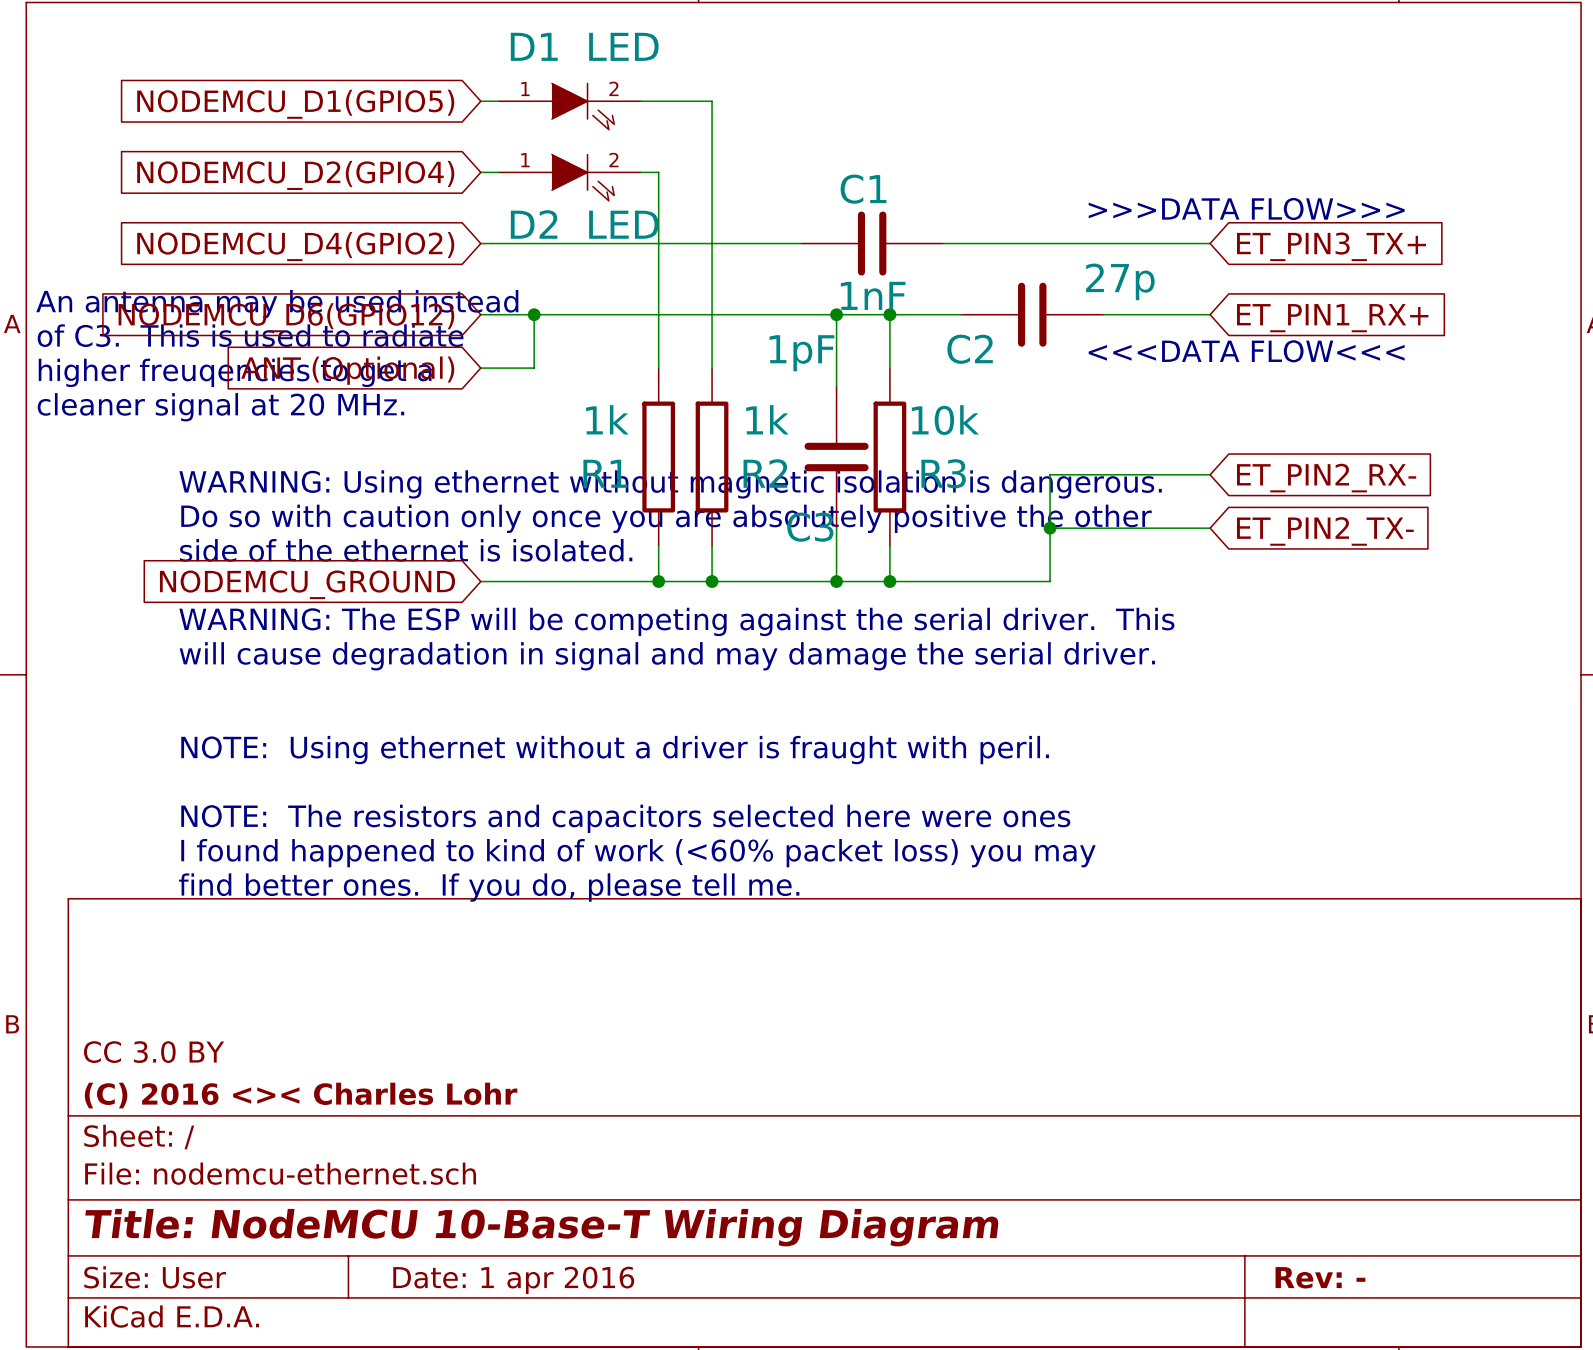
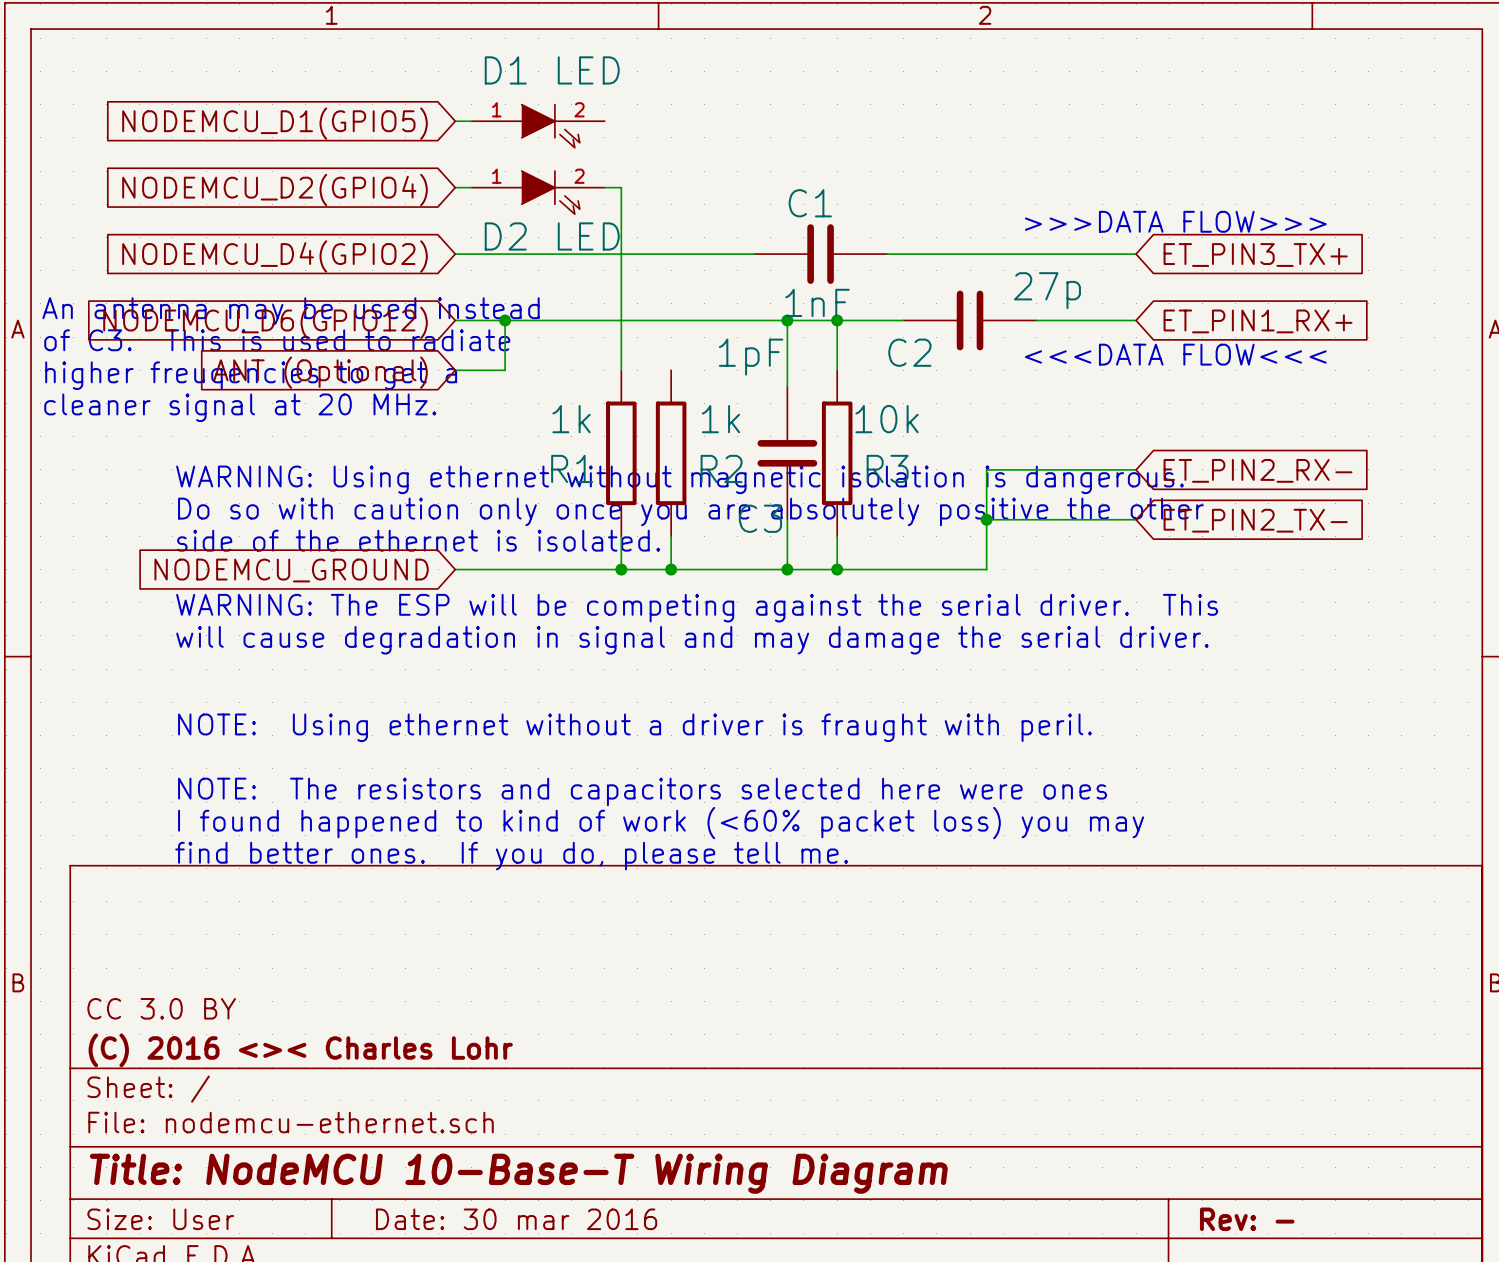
wire: (640, 101) (712, 101) (712, 368) -> none
title block: Date: 1 apr 2016 (513, 1280) -> Date: 30 mar 2016 (516, 1219)

